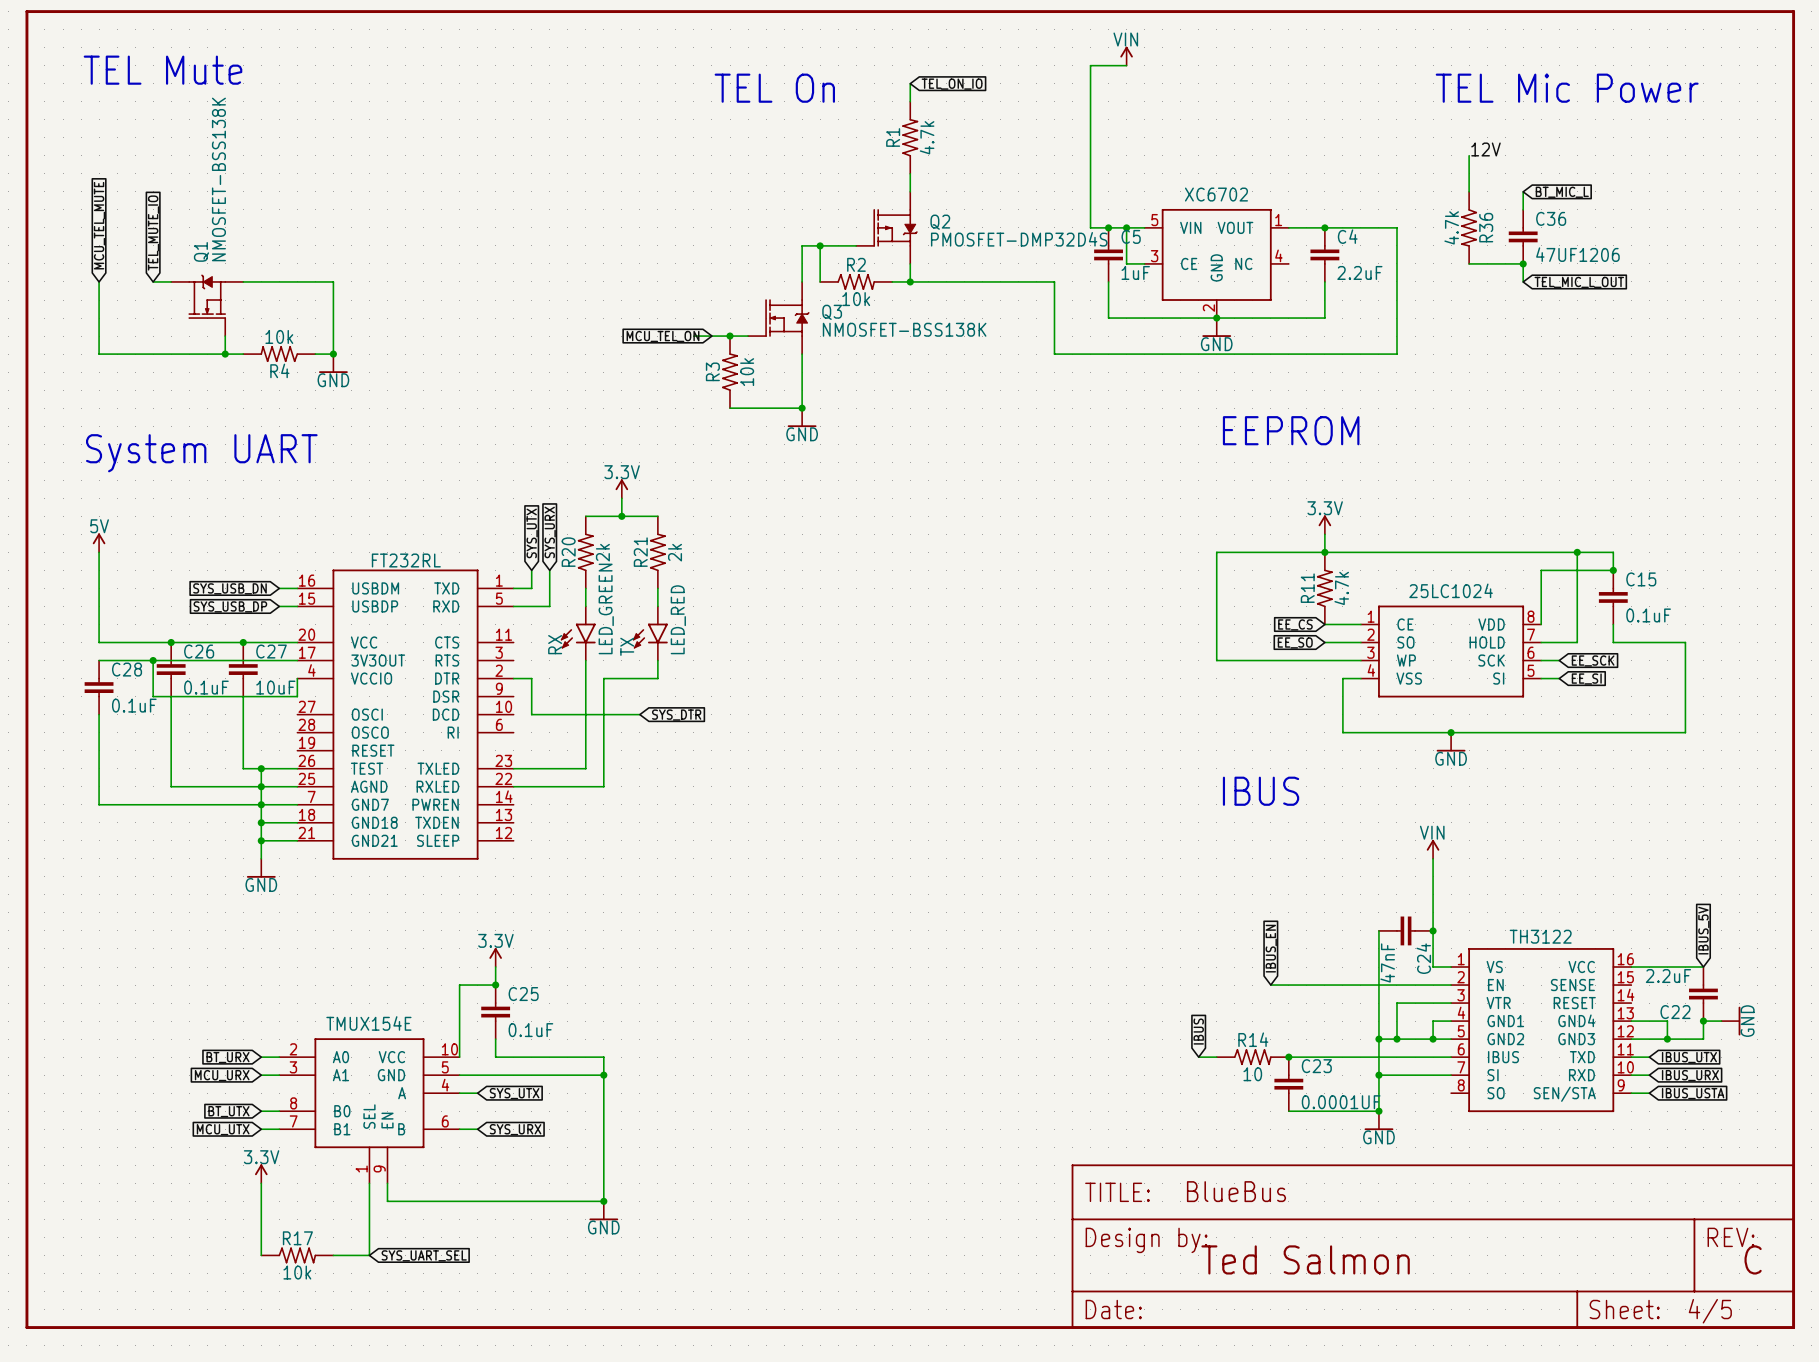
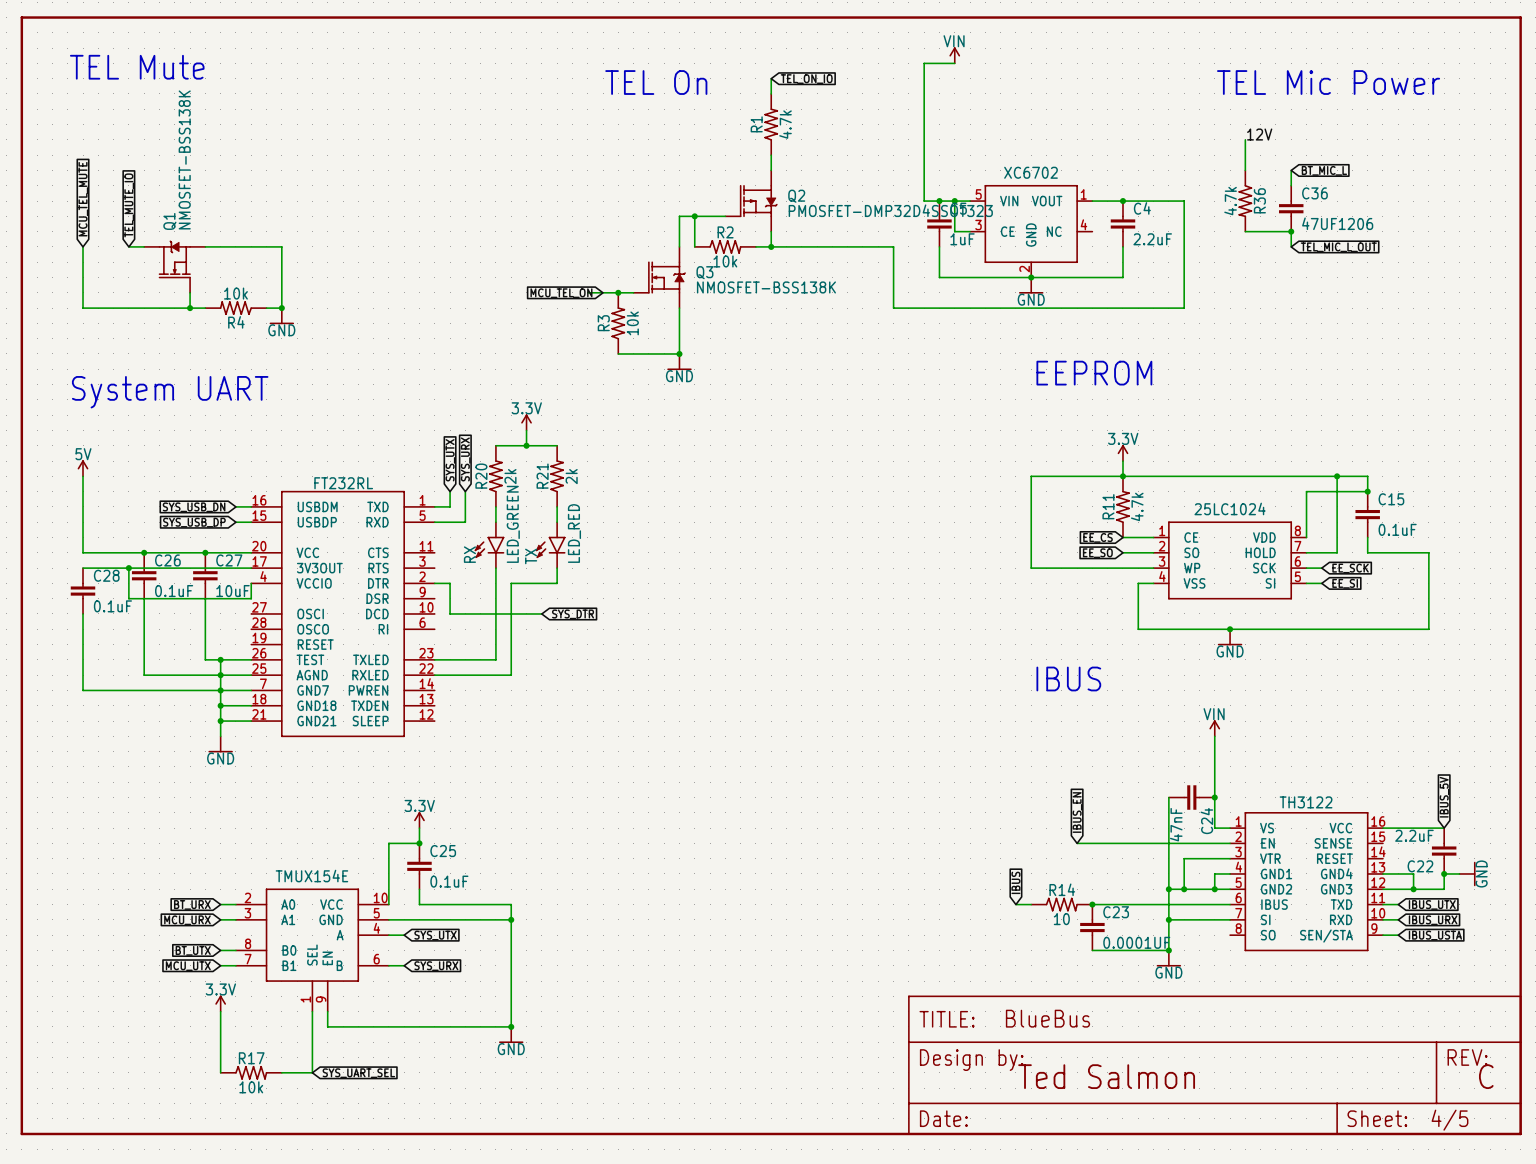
Q2 value: PMOSFET-DMP32D4S (1019, 239) -> PMOSFET-DMP32D4SSOT323 (890, 210)

